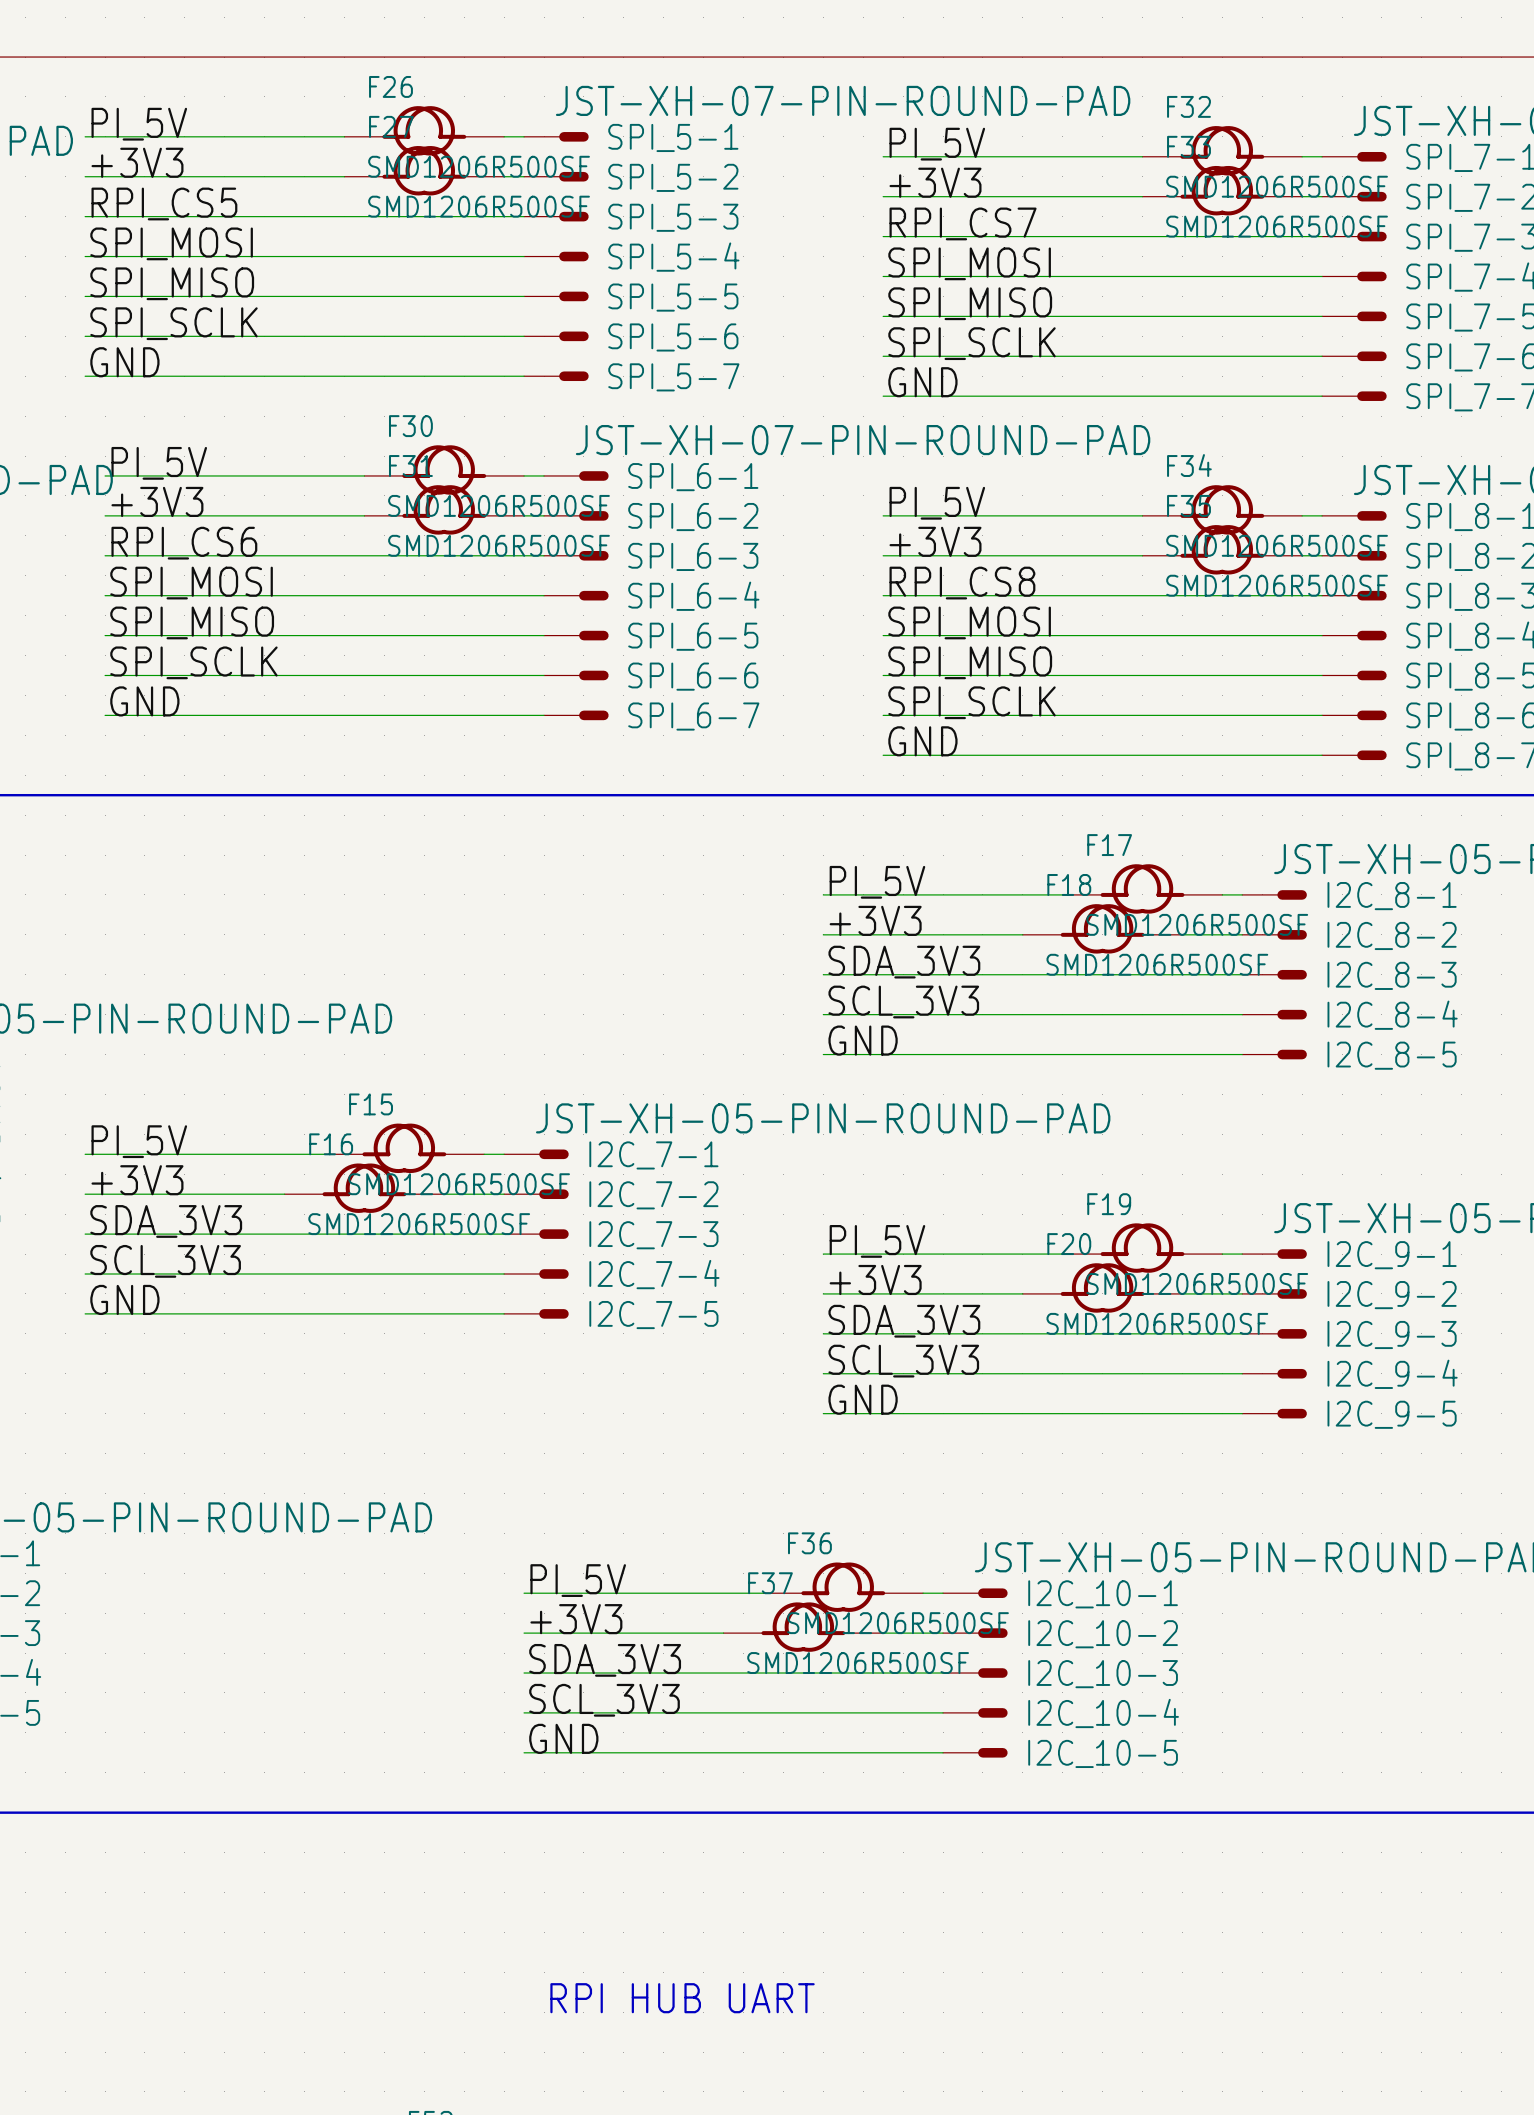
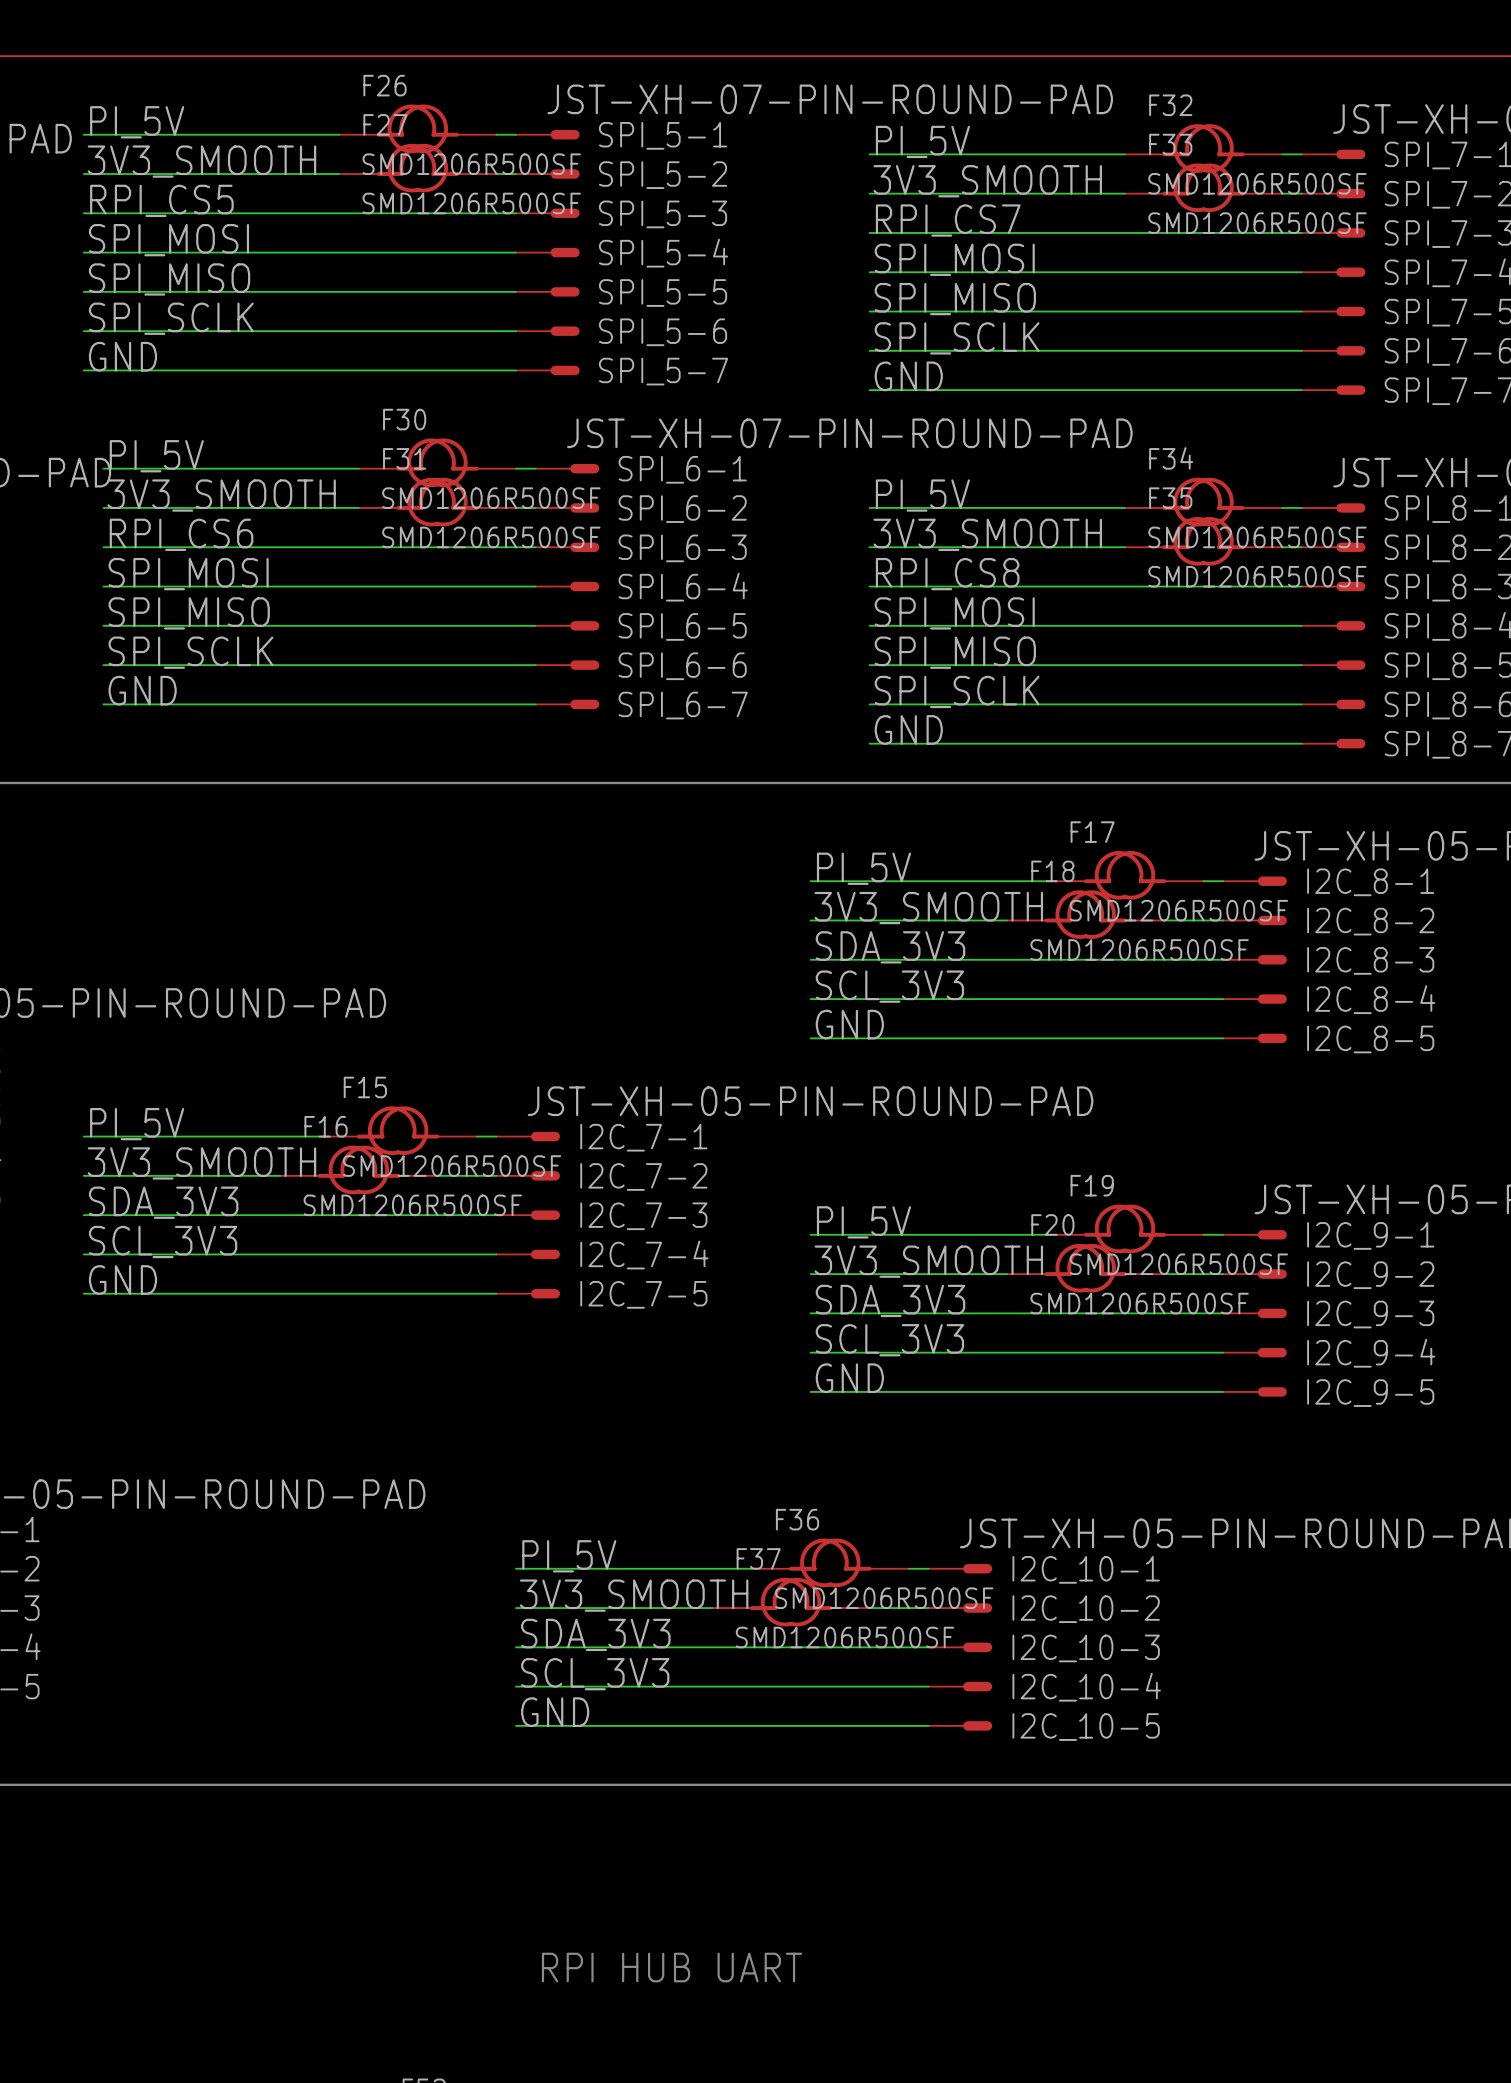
label: +3V3 (137, 162) -> 3V3_SMOOTH (201, 161)
label: +3V3 (935, 182) -> 3V3_SMOOTH (987, 181)
label: +3V3 (157, 501) -> 3V3_SMOOTH (221, 495)
label: +3V3 (935, 541) -> 3V3_SMOOTH (987, 534)
label: +3V3 (875, 920) -> 3V3_SMOOTH (928, 908)
label: +3V3 (137, 1180) -> 3V3_SMOOTH (201, 1163)
label: +3V3 (875, 1279) -> 3V3_SMOOTH (928, 1261)
label: +3V3 (576, 1619) -> 3V3_SMOOTH (634, 1595)

